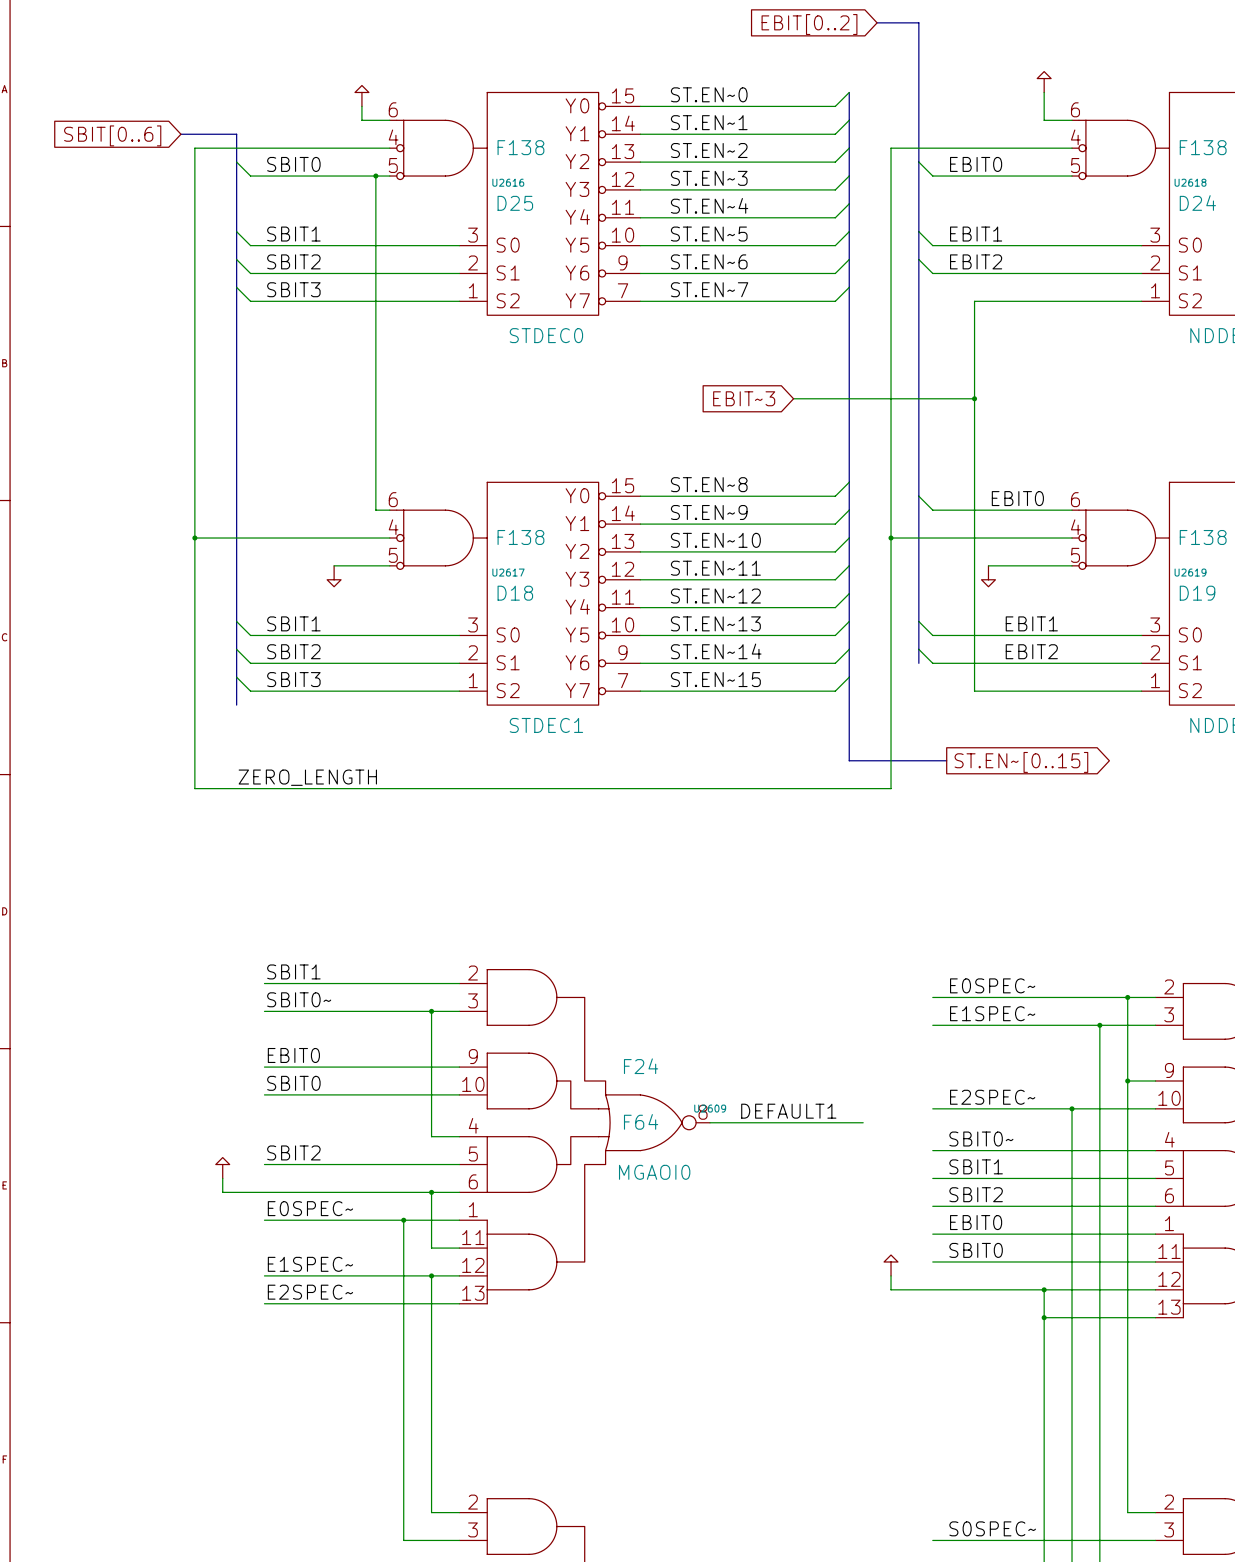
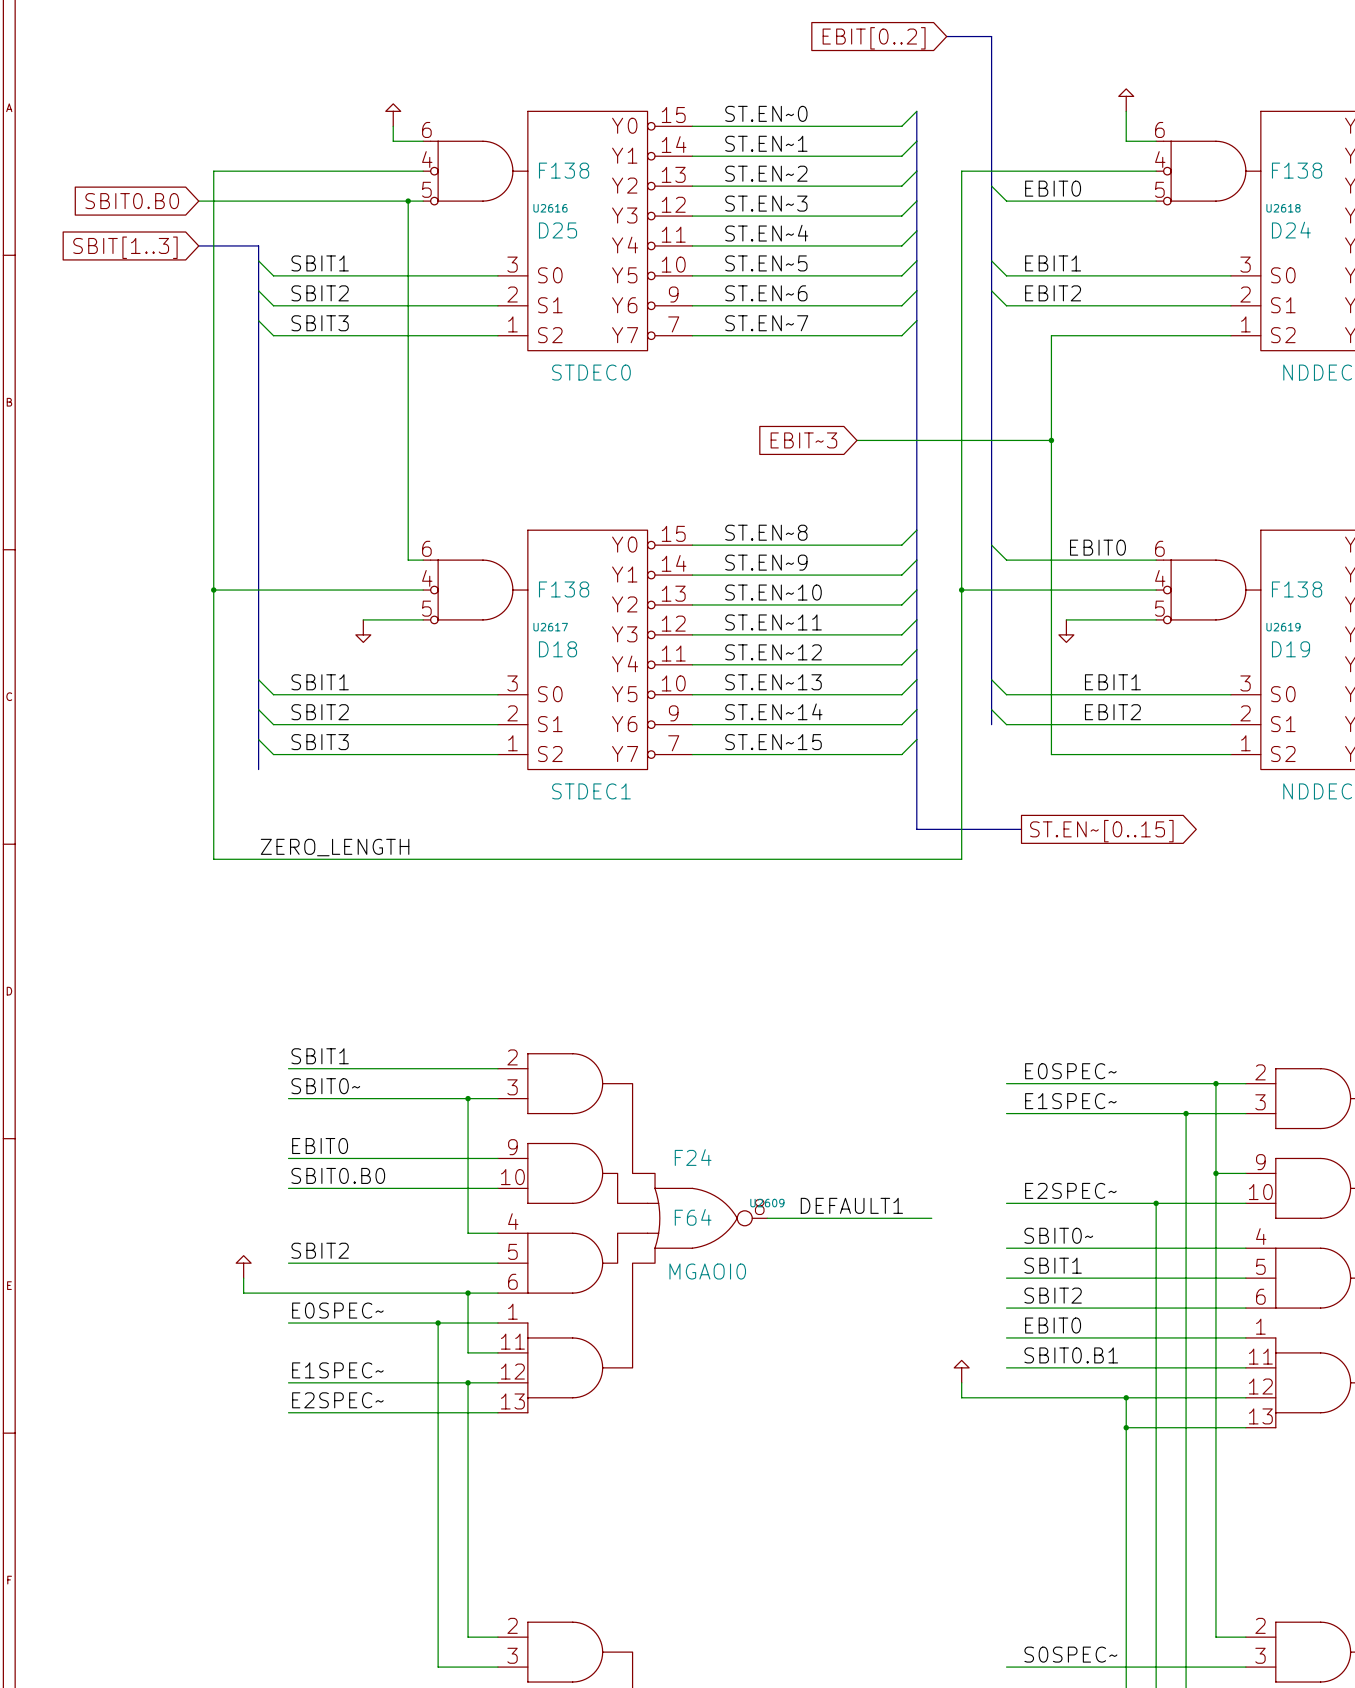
bus: (180, 134) (236, 134) (236, 217) -> (198, 245) (258, 245)
global label: SBIT[0..6] (112, 135) -> none
wire: (236, 162) (250, 176) -> (198, 201) (273, 201)
label: SBIT0 (293, 164) -> none
global label: none -> SBIT0.B0 (132, 201)
global label: none -> SBIT[1..3] (125, 247)
label: SBIT0 (293, 1083) -> SBIT0.B0 (338, 1175)
label: SBIT0 (976, 1250) -> SBIT0.B1 (1071, 1355)

